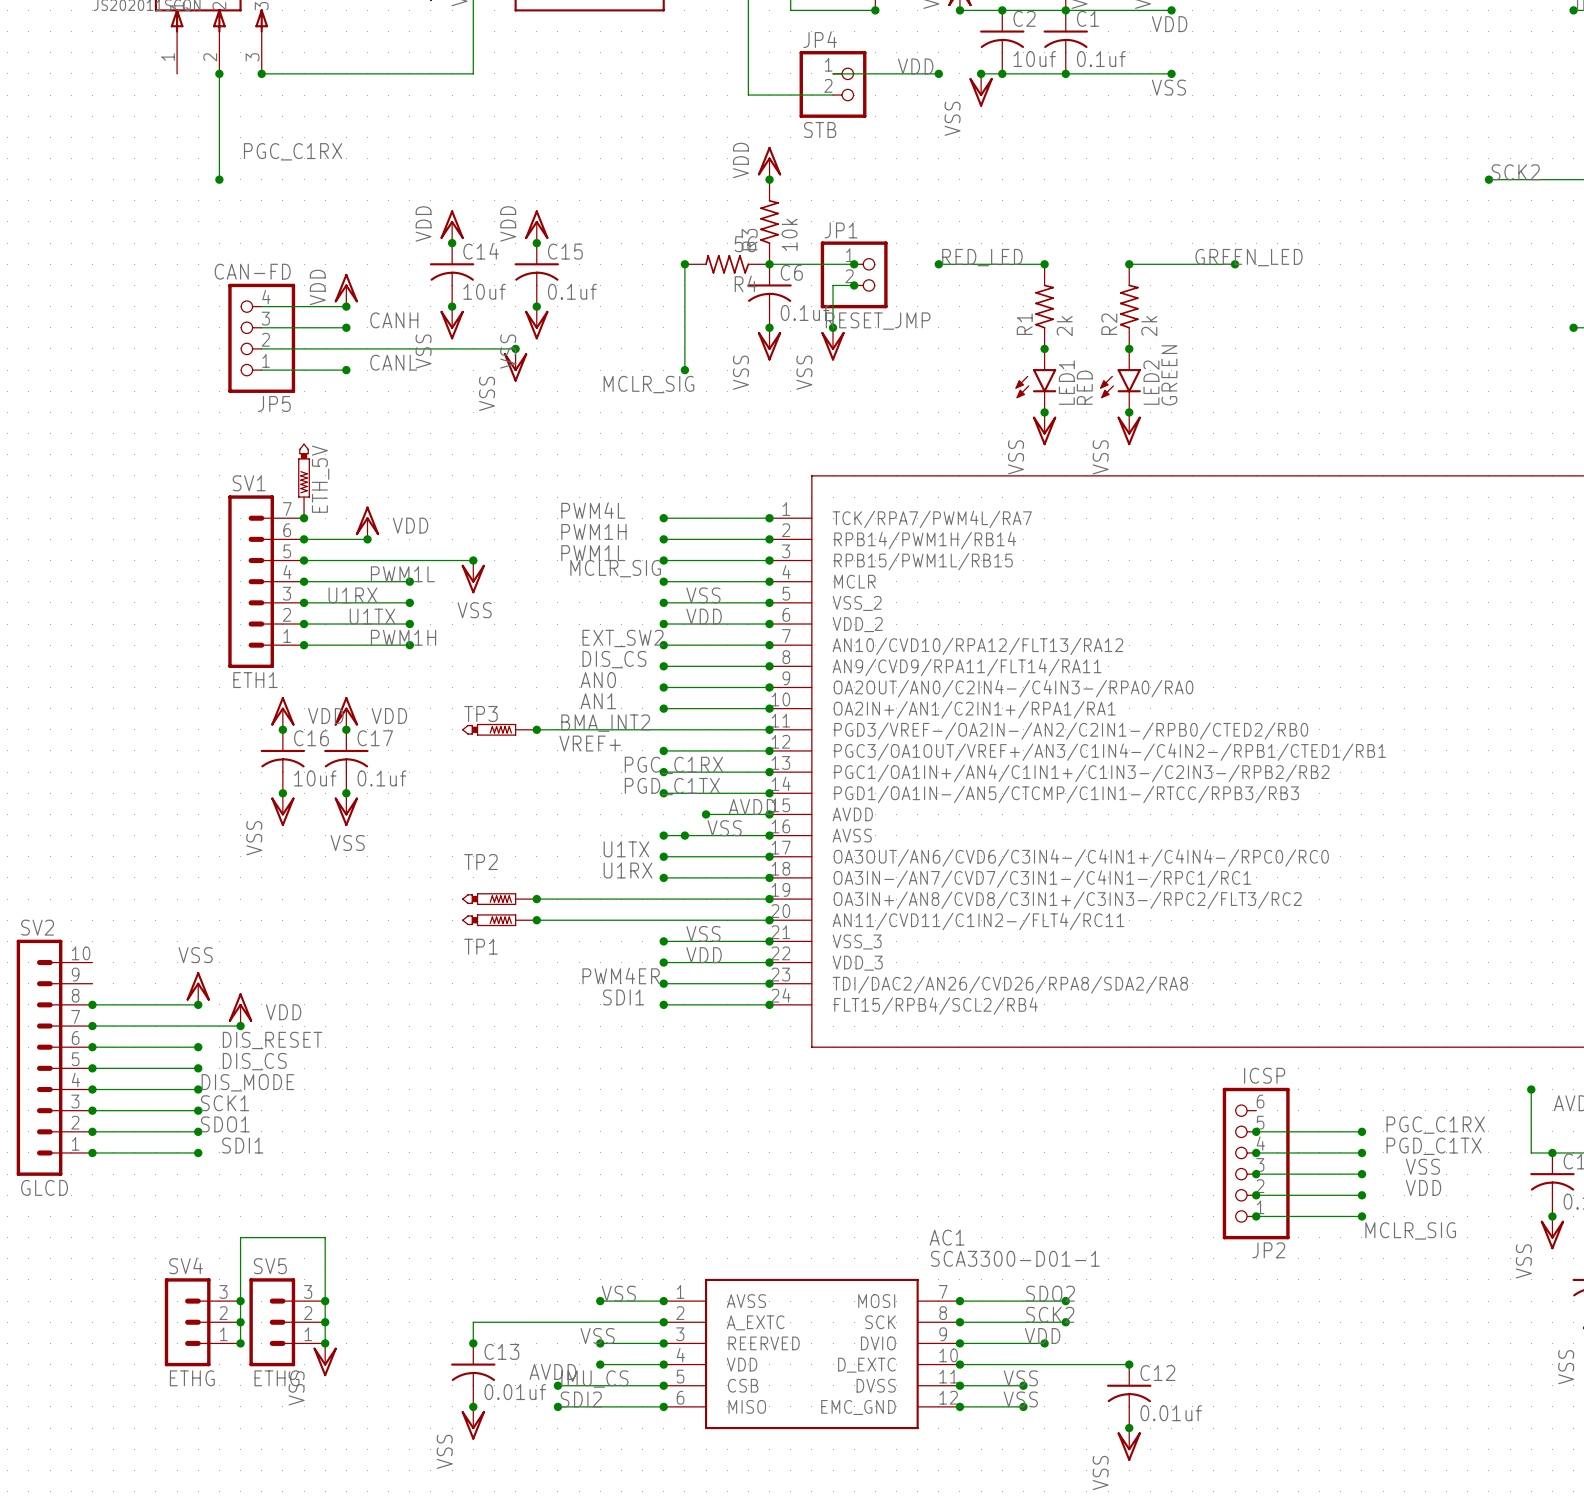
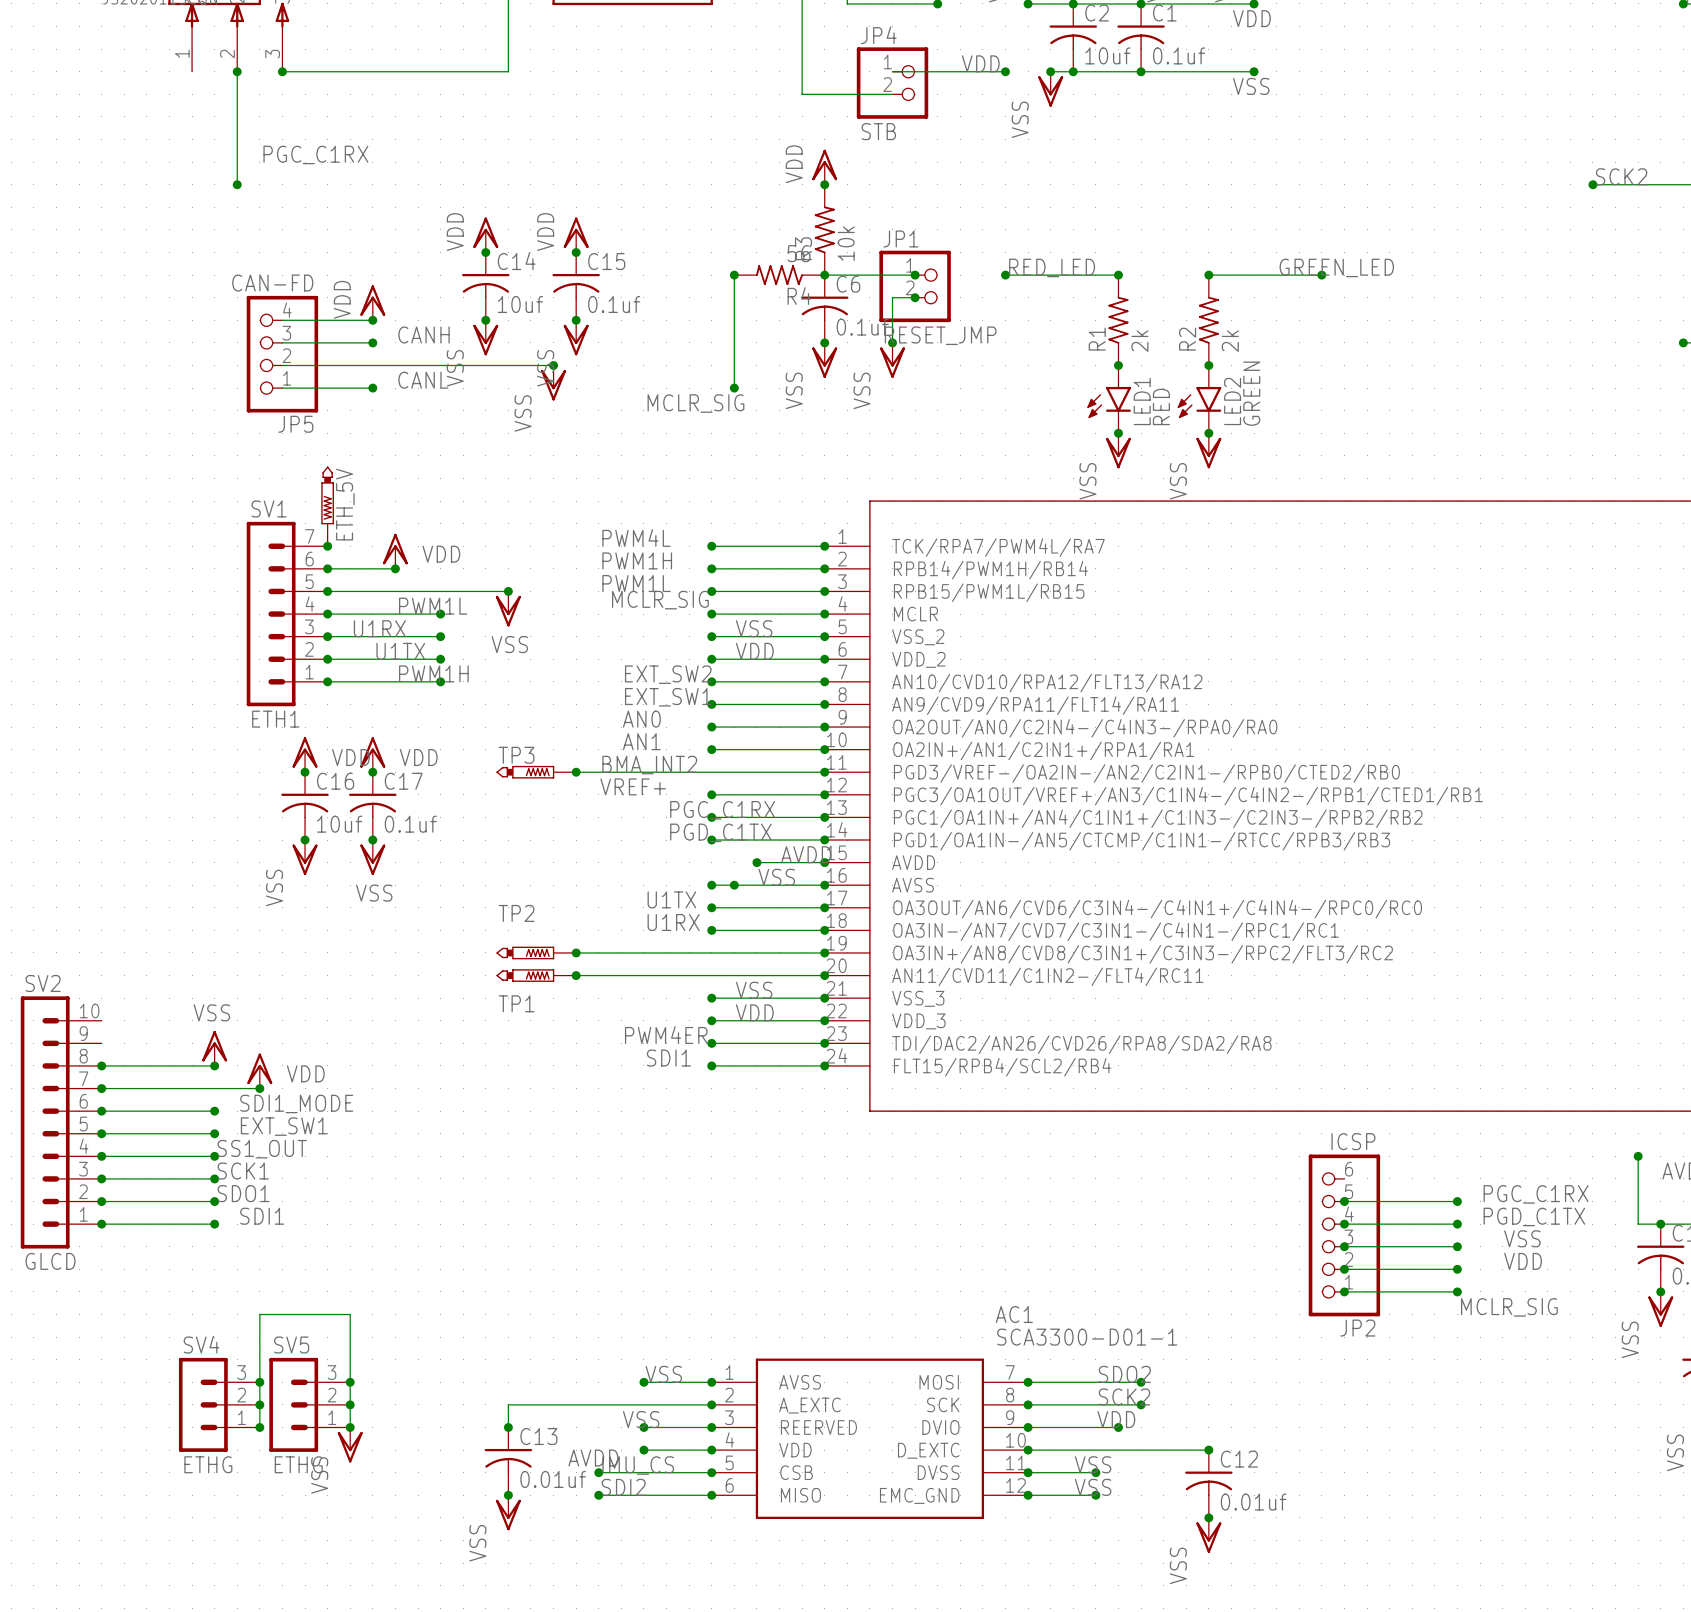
label: DIS_CS (614, 659) -> EXT_SW1 (668, 697)
label: DIS_RESET (272, 1040) -> SDI1_MODE (296, 1103)
label: DIS_CS (254, 1061) -> EXT_SW1 (284, 1126)
label: DIS_MODE (247, 1082) -> SS1_OUT (262, 1149)

